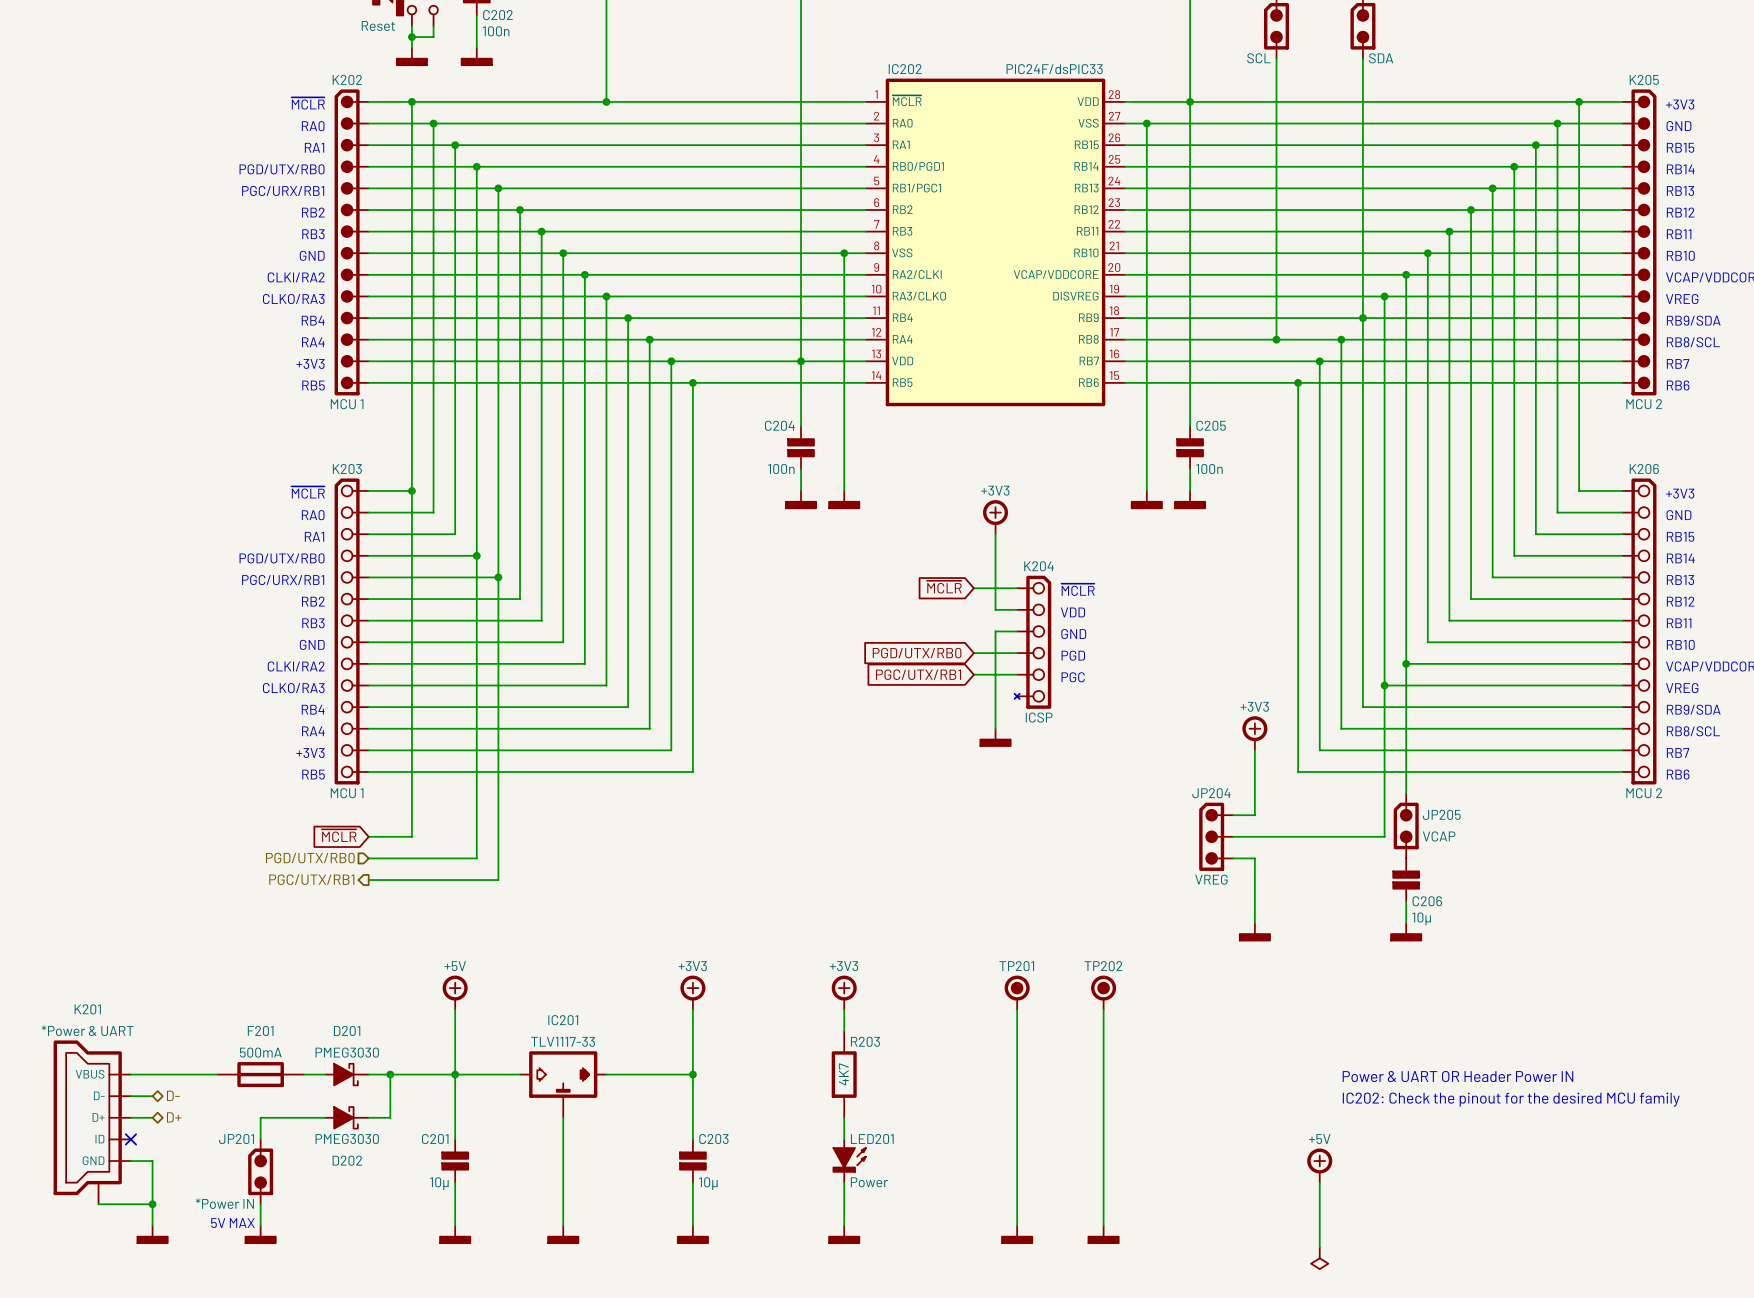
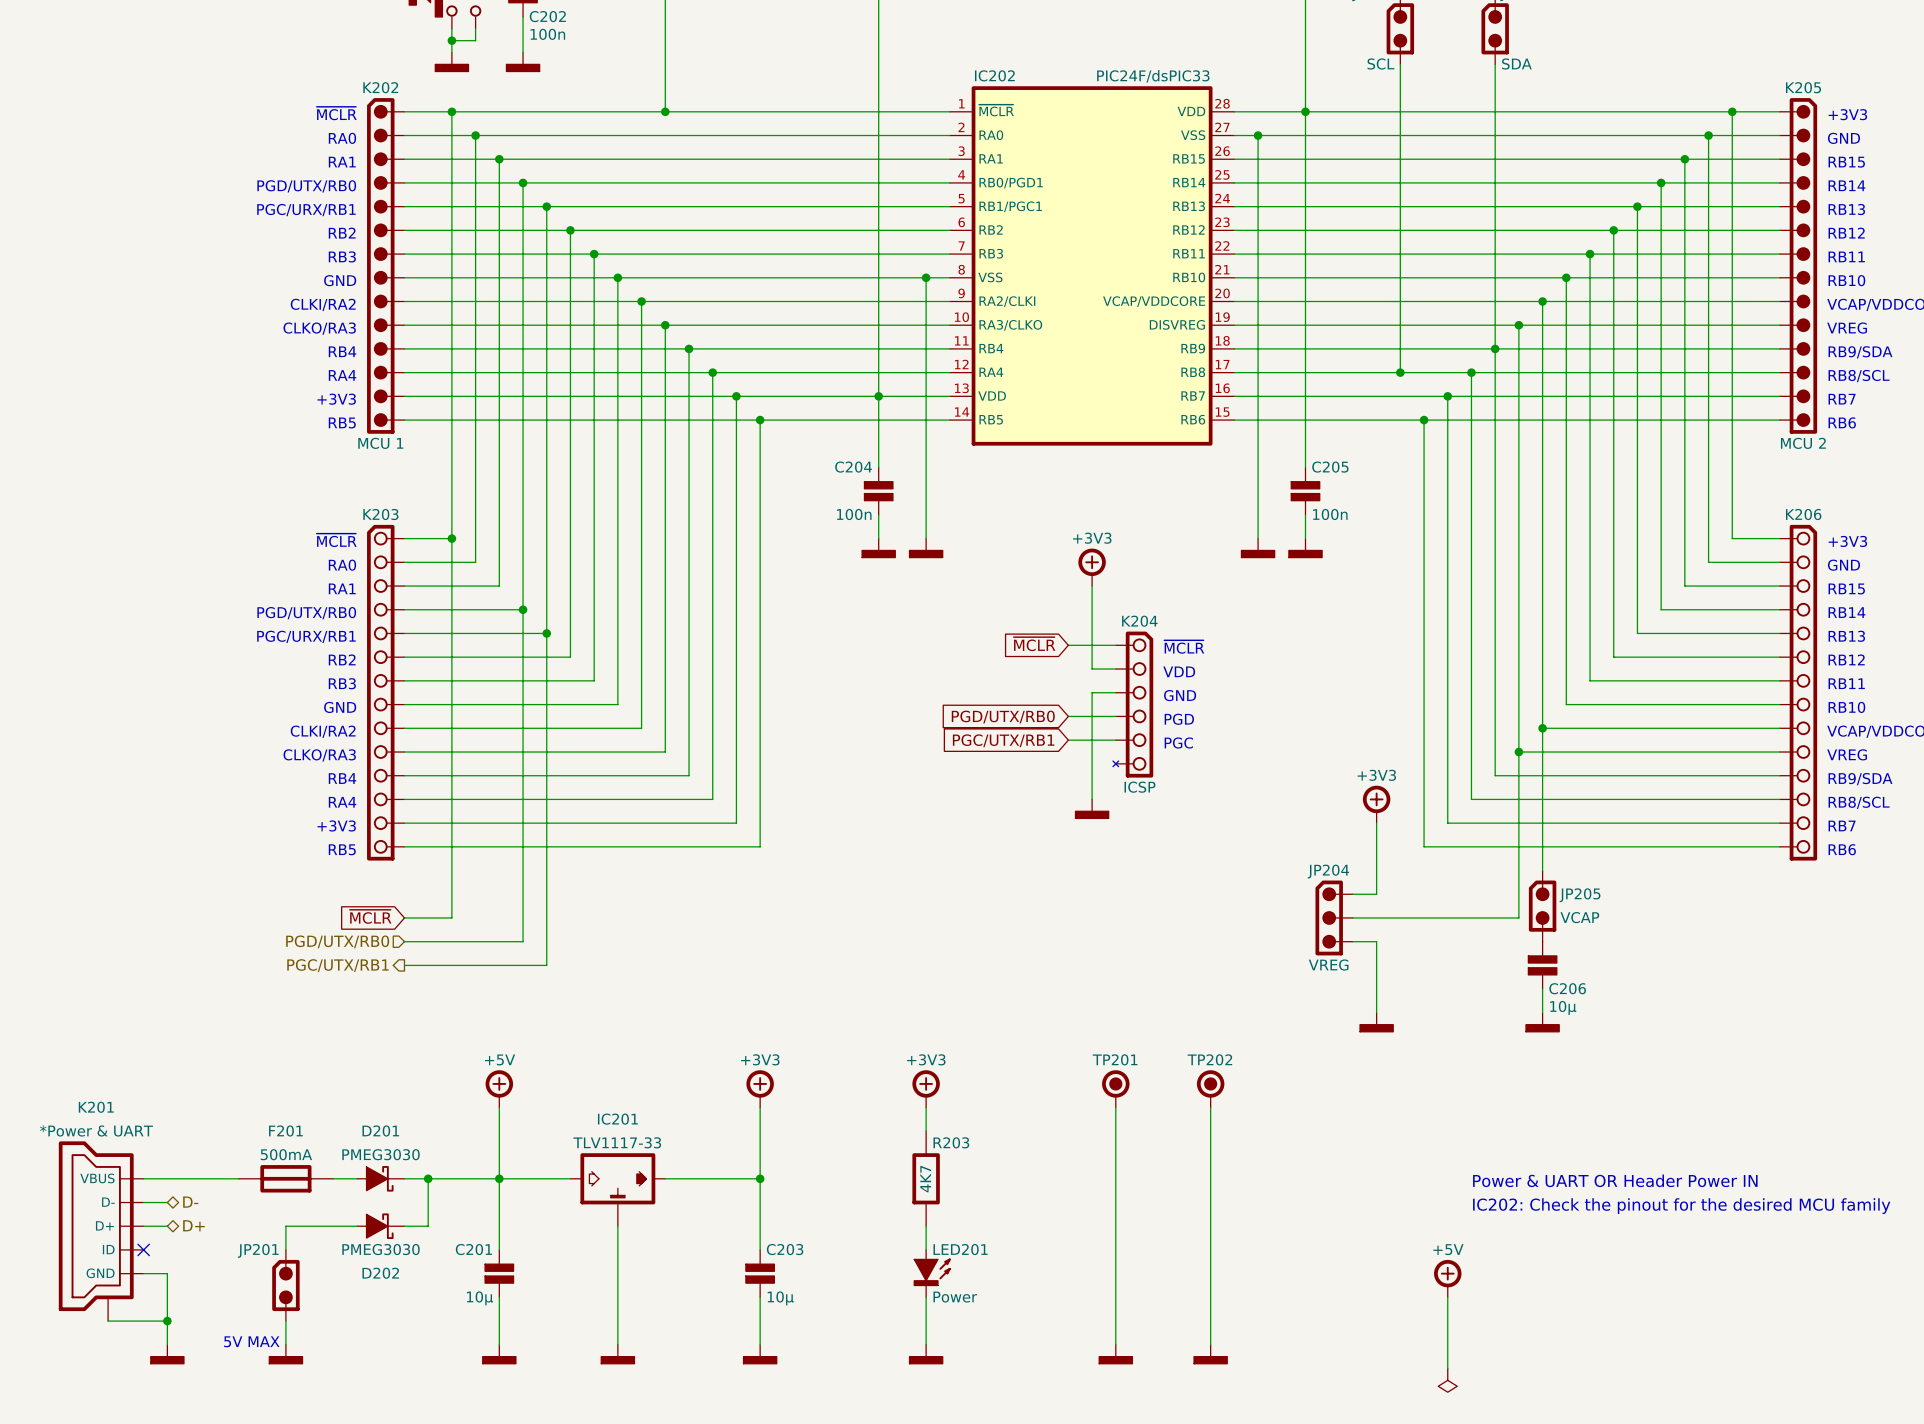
part value: Reset (378, 25) -> none
K203 value: MCU 1 (347, 793) -> none
K206 value: MCU 2 (1644, 793) -> none
JP201 value: *Power IN (224, 1203) -> none

